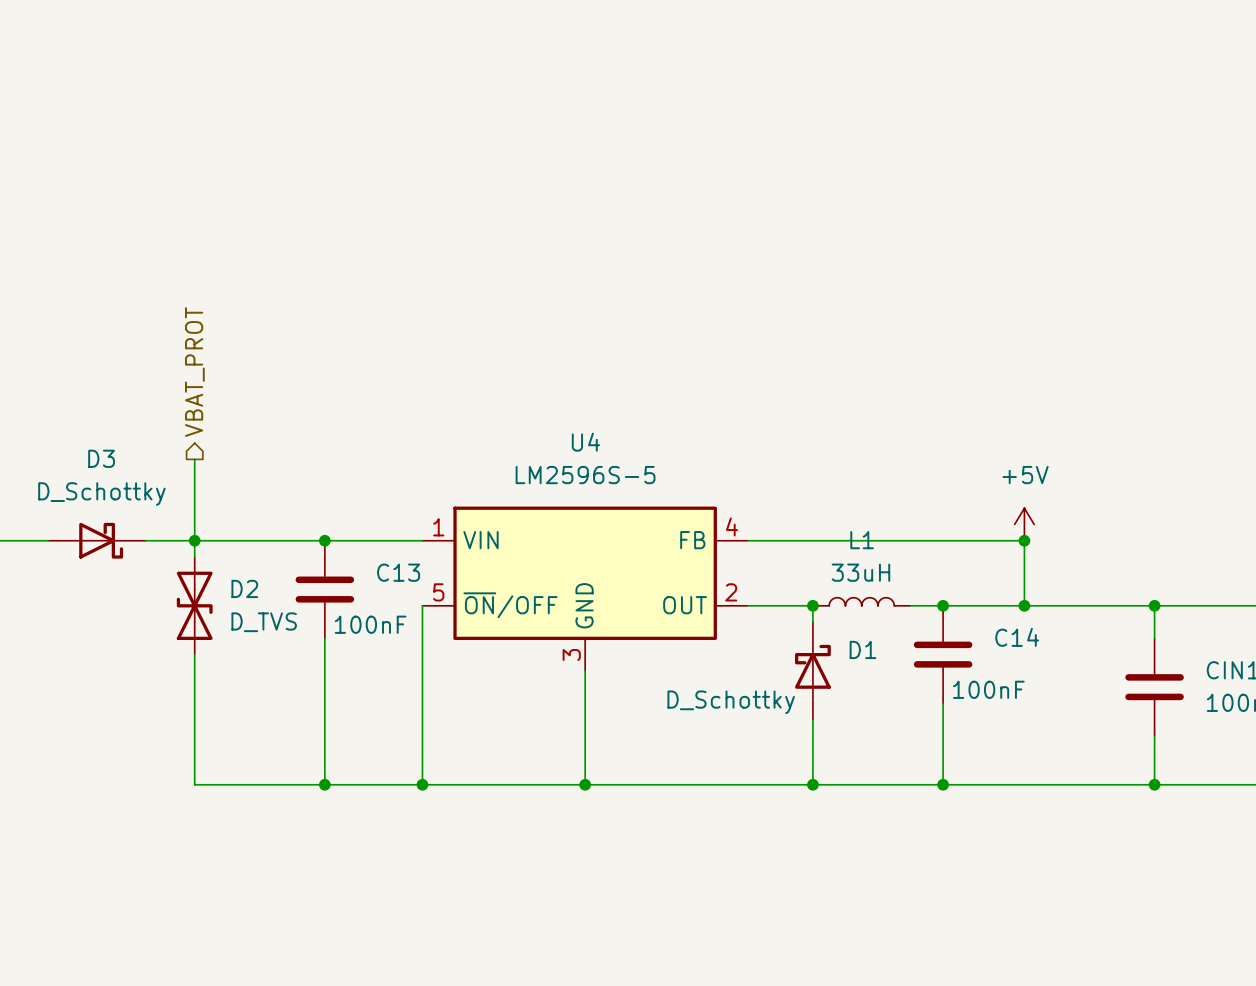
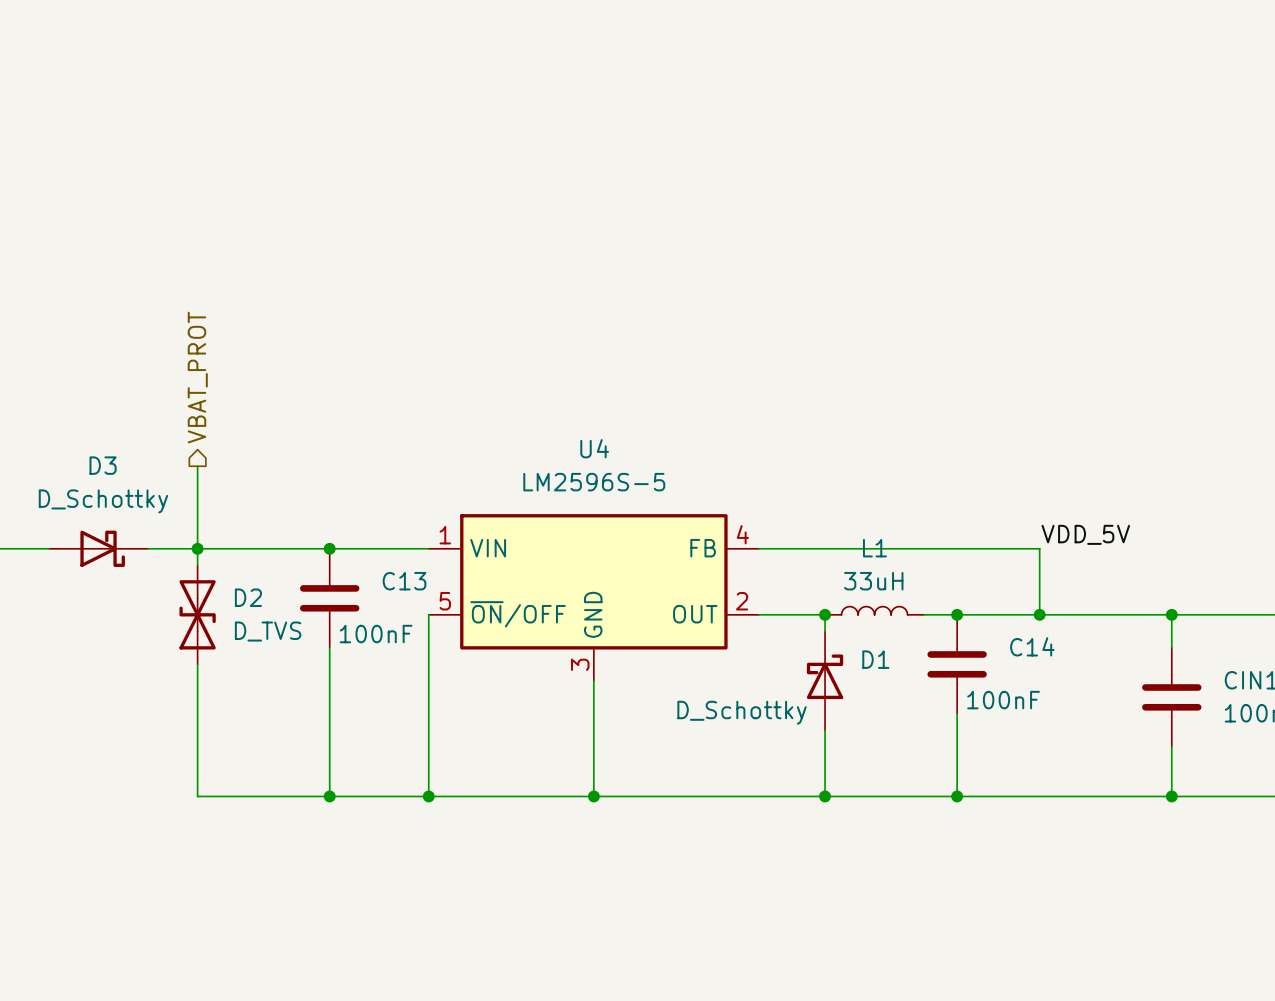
power symbol: +5V (1024, 524) -> none
label: none -> VDD_5V (1085, 534)
junction: (1024, 540) -> none

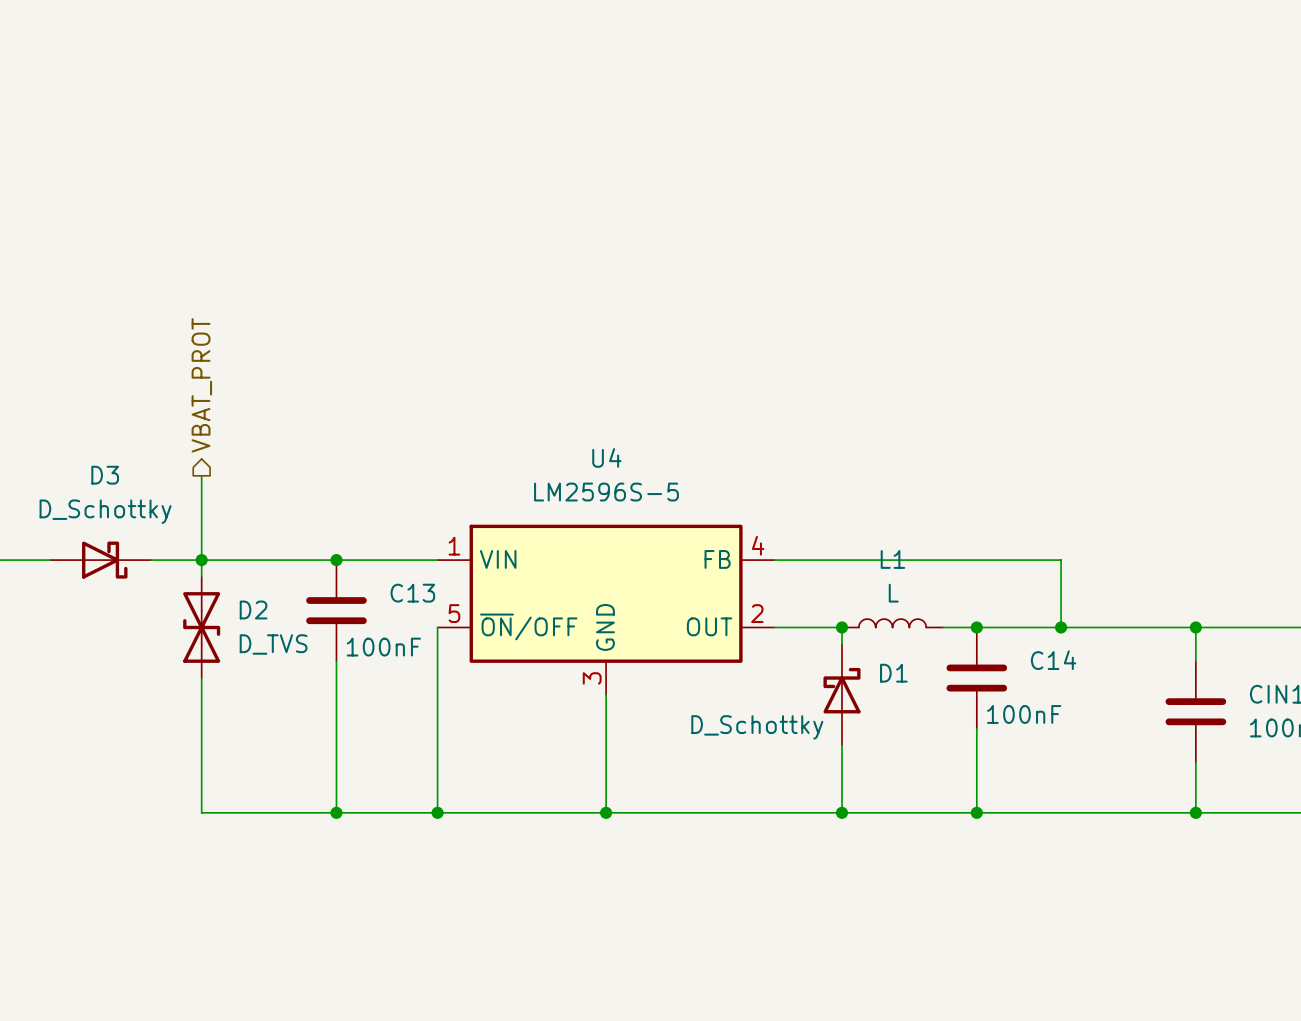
label: VDD_5V (1085, 534) -> none
L1 value: 33uH (873, 581) -> L (893, 593)

